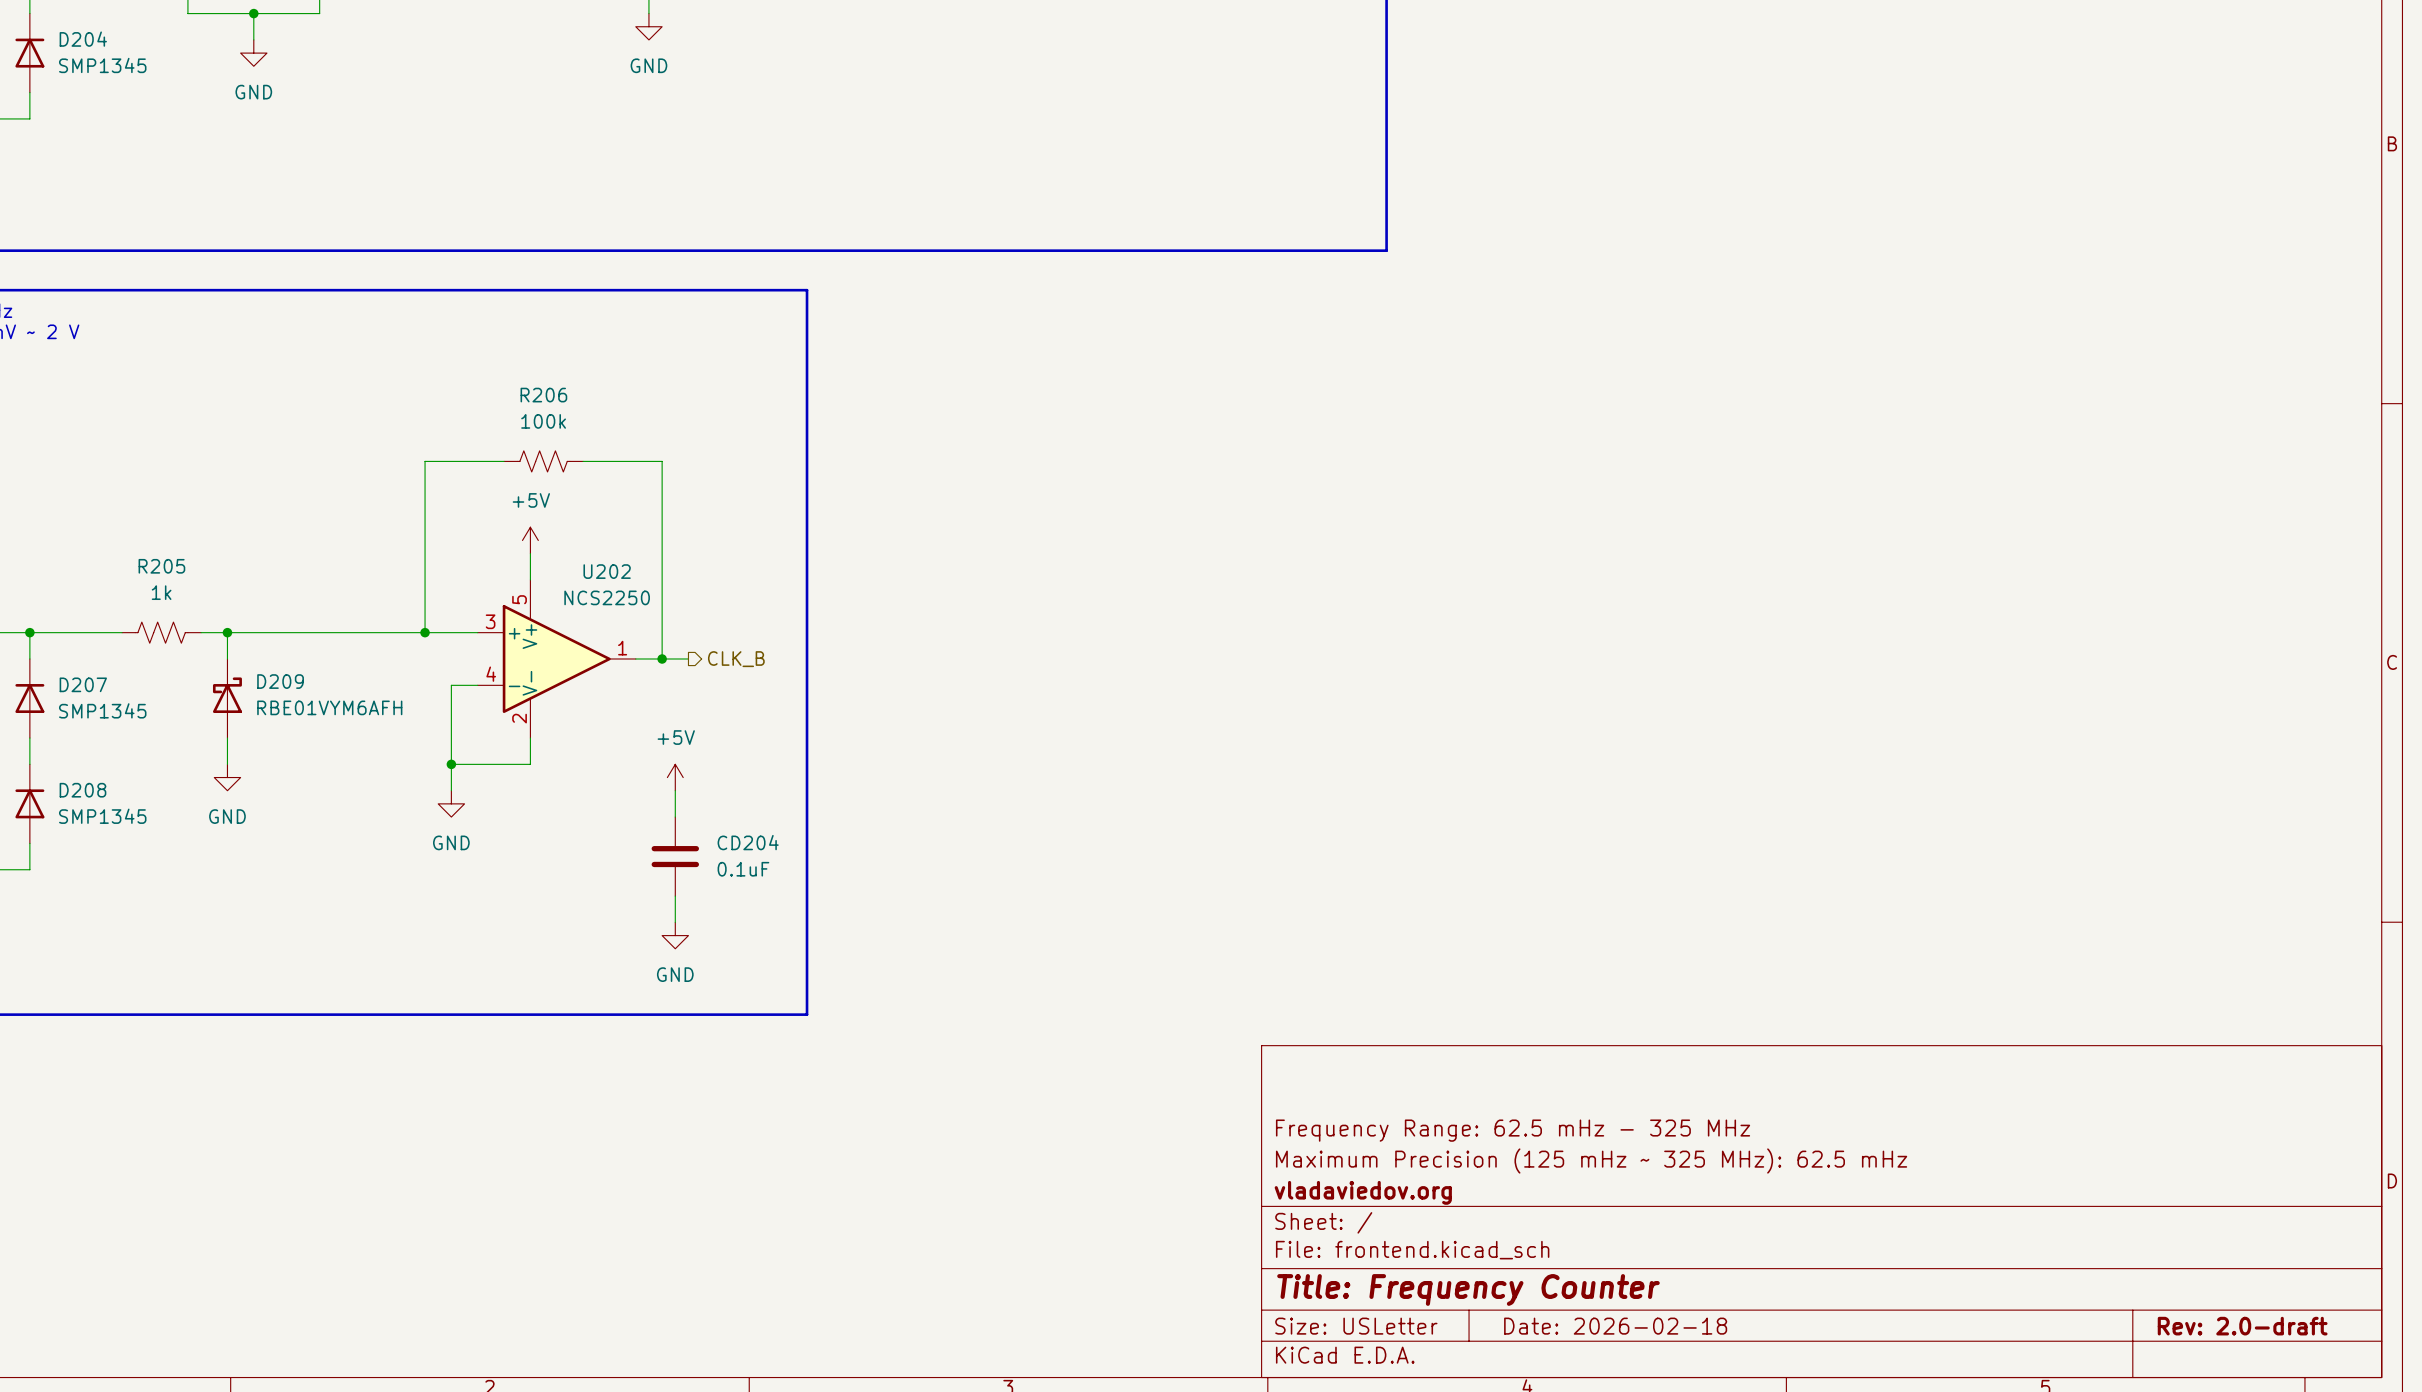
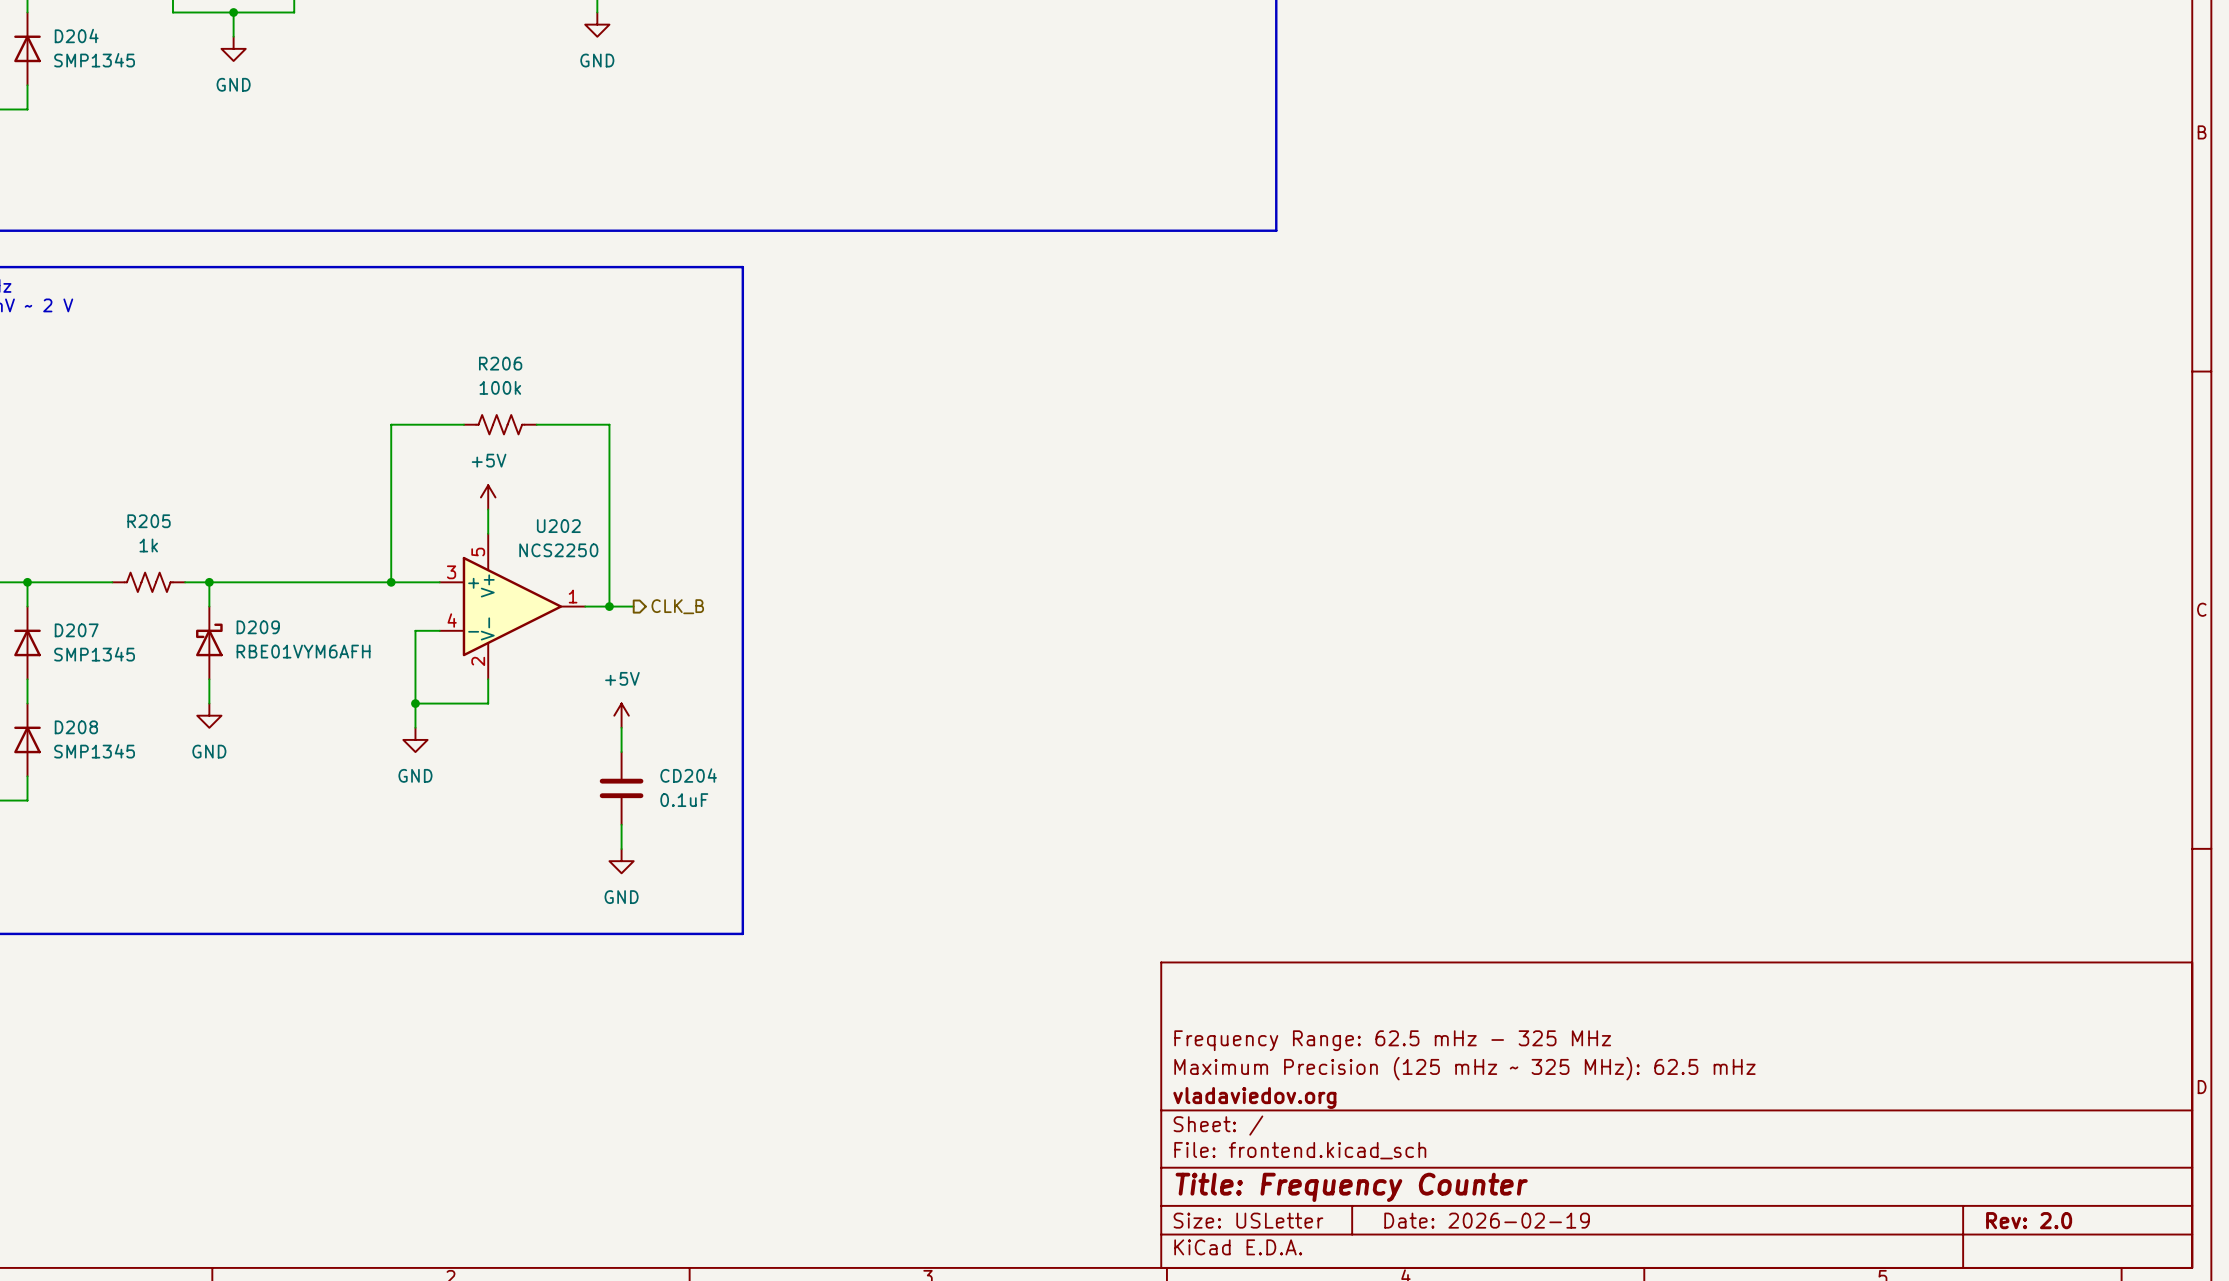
title block: Date: 2026-02-18 (1615, 1326) -> Date: 2026-02-19 (1487, 1220)
title block: Rev: 2.0-draft (2242, 1326) -> Rev: 2.0 (2029, 1220)

